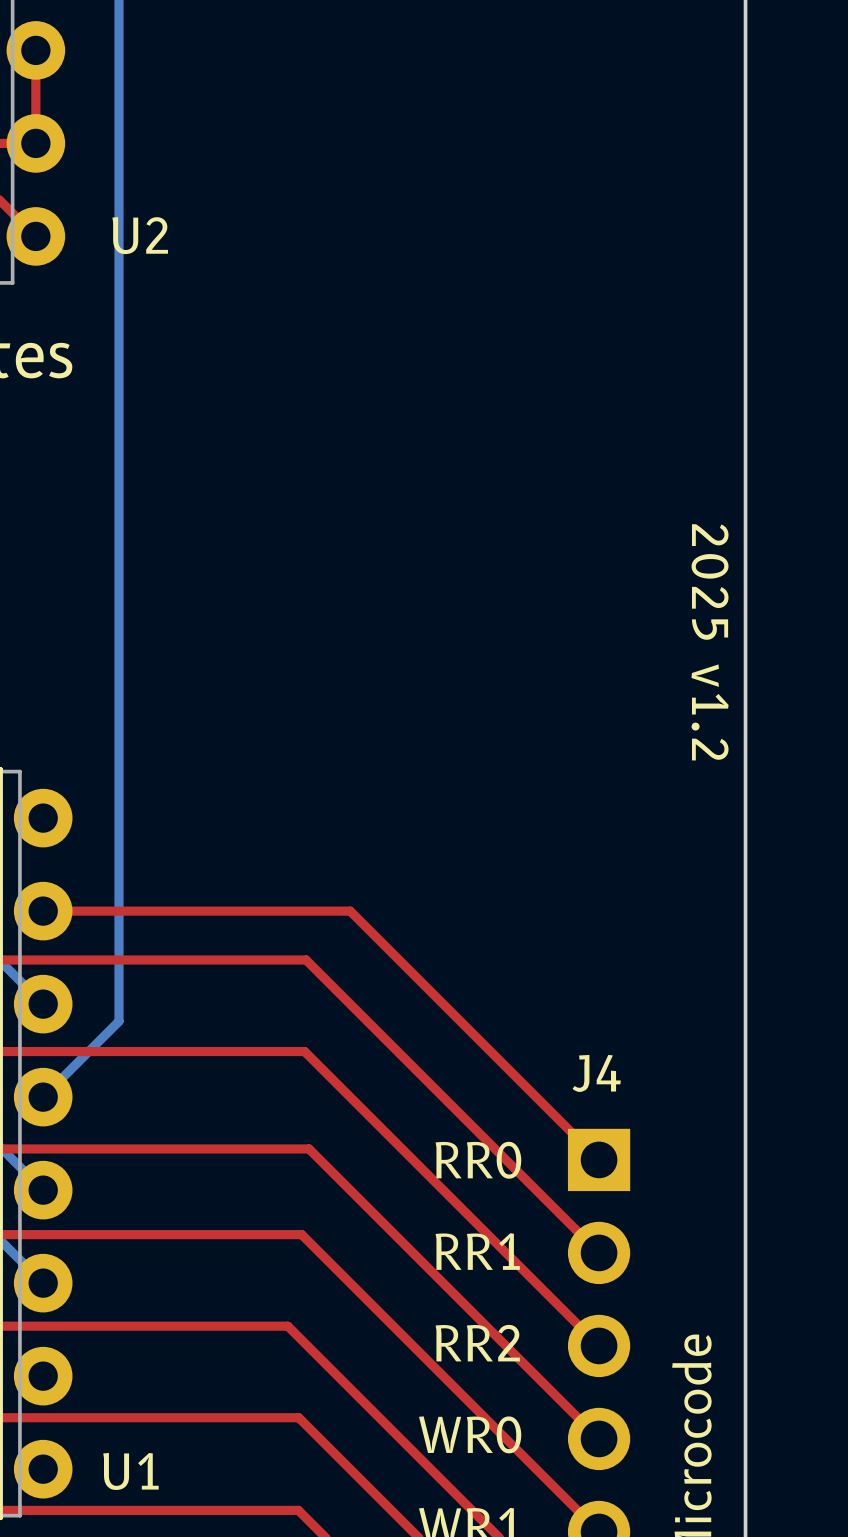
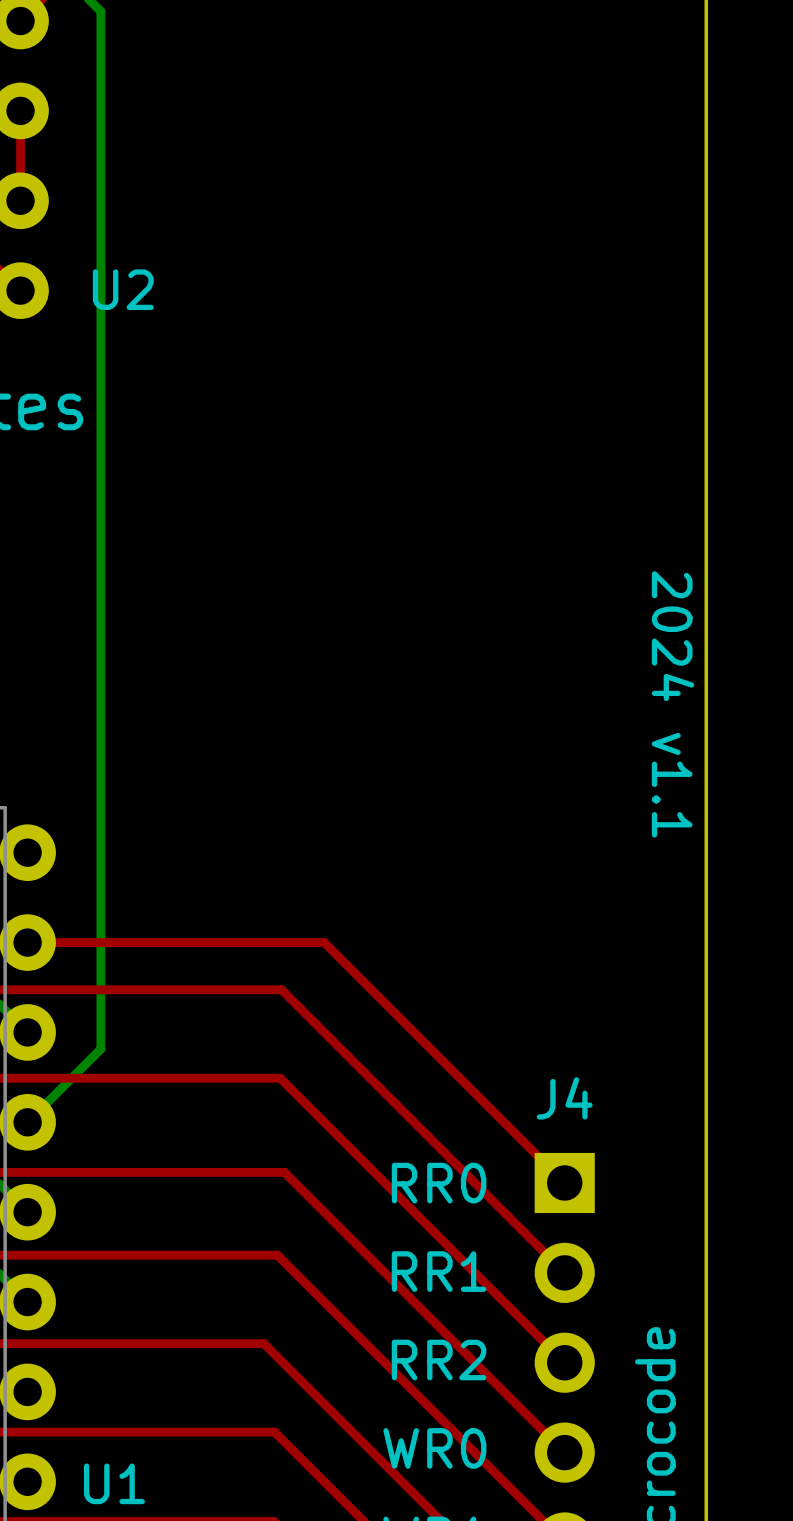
text: 2025 v1.2 (710, 642) -> 2024 v1.1 (673, 704)

